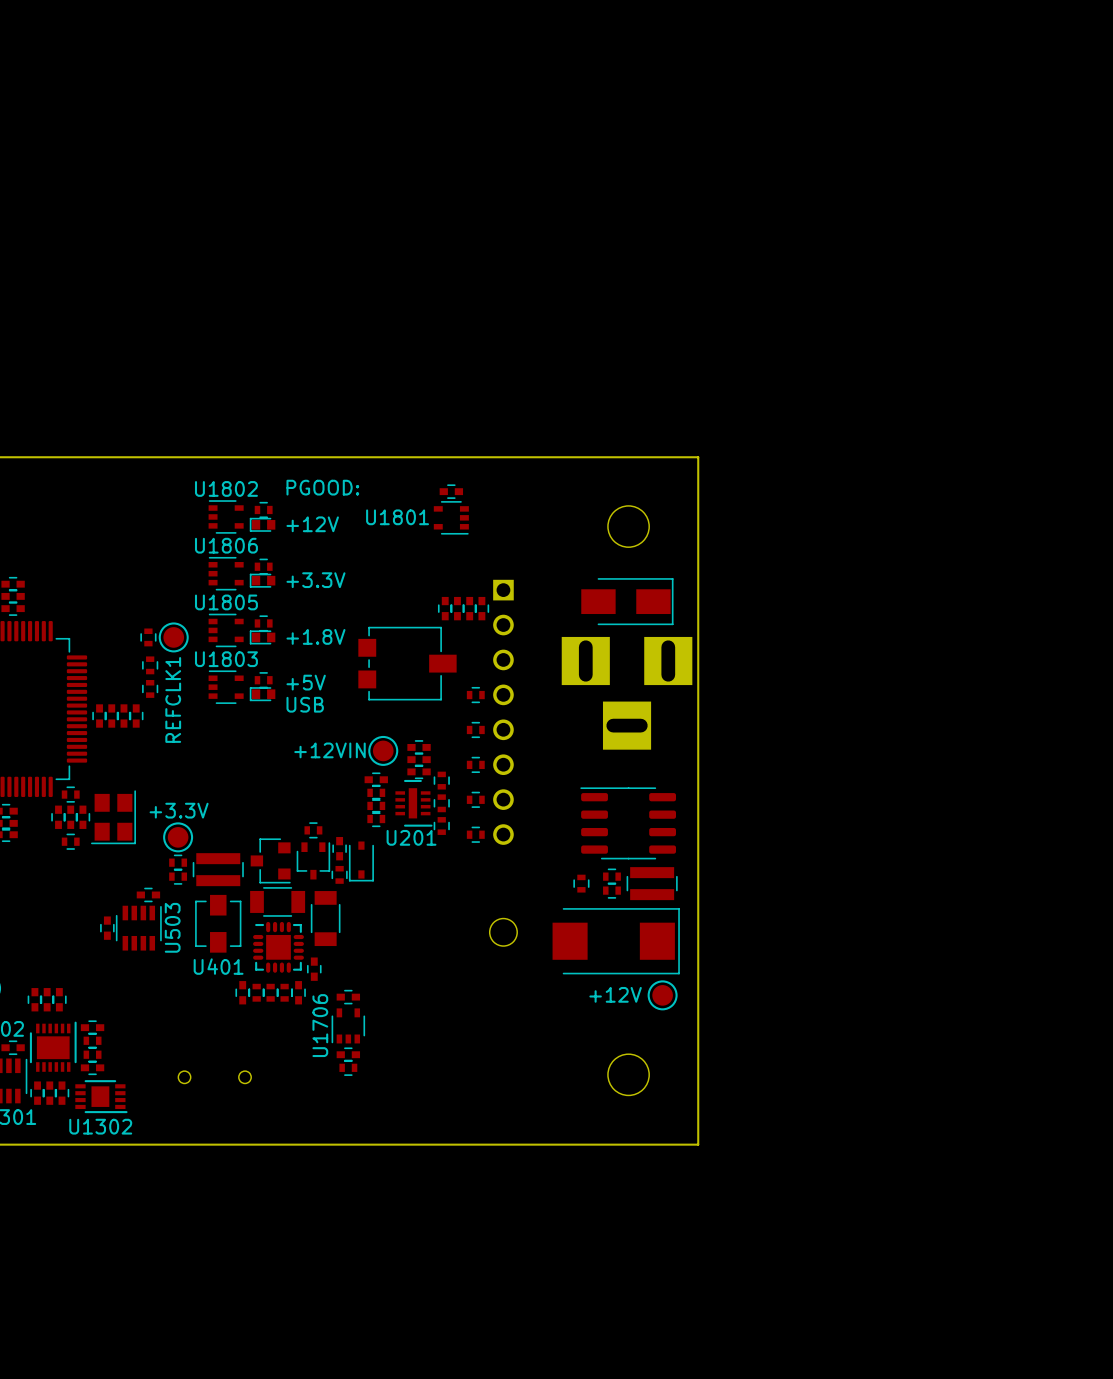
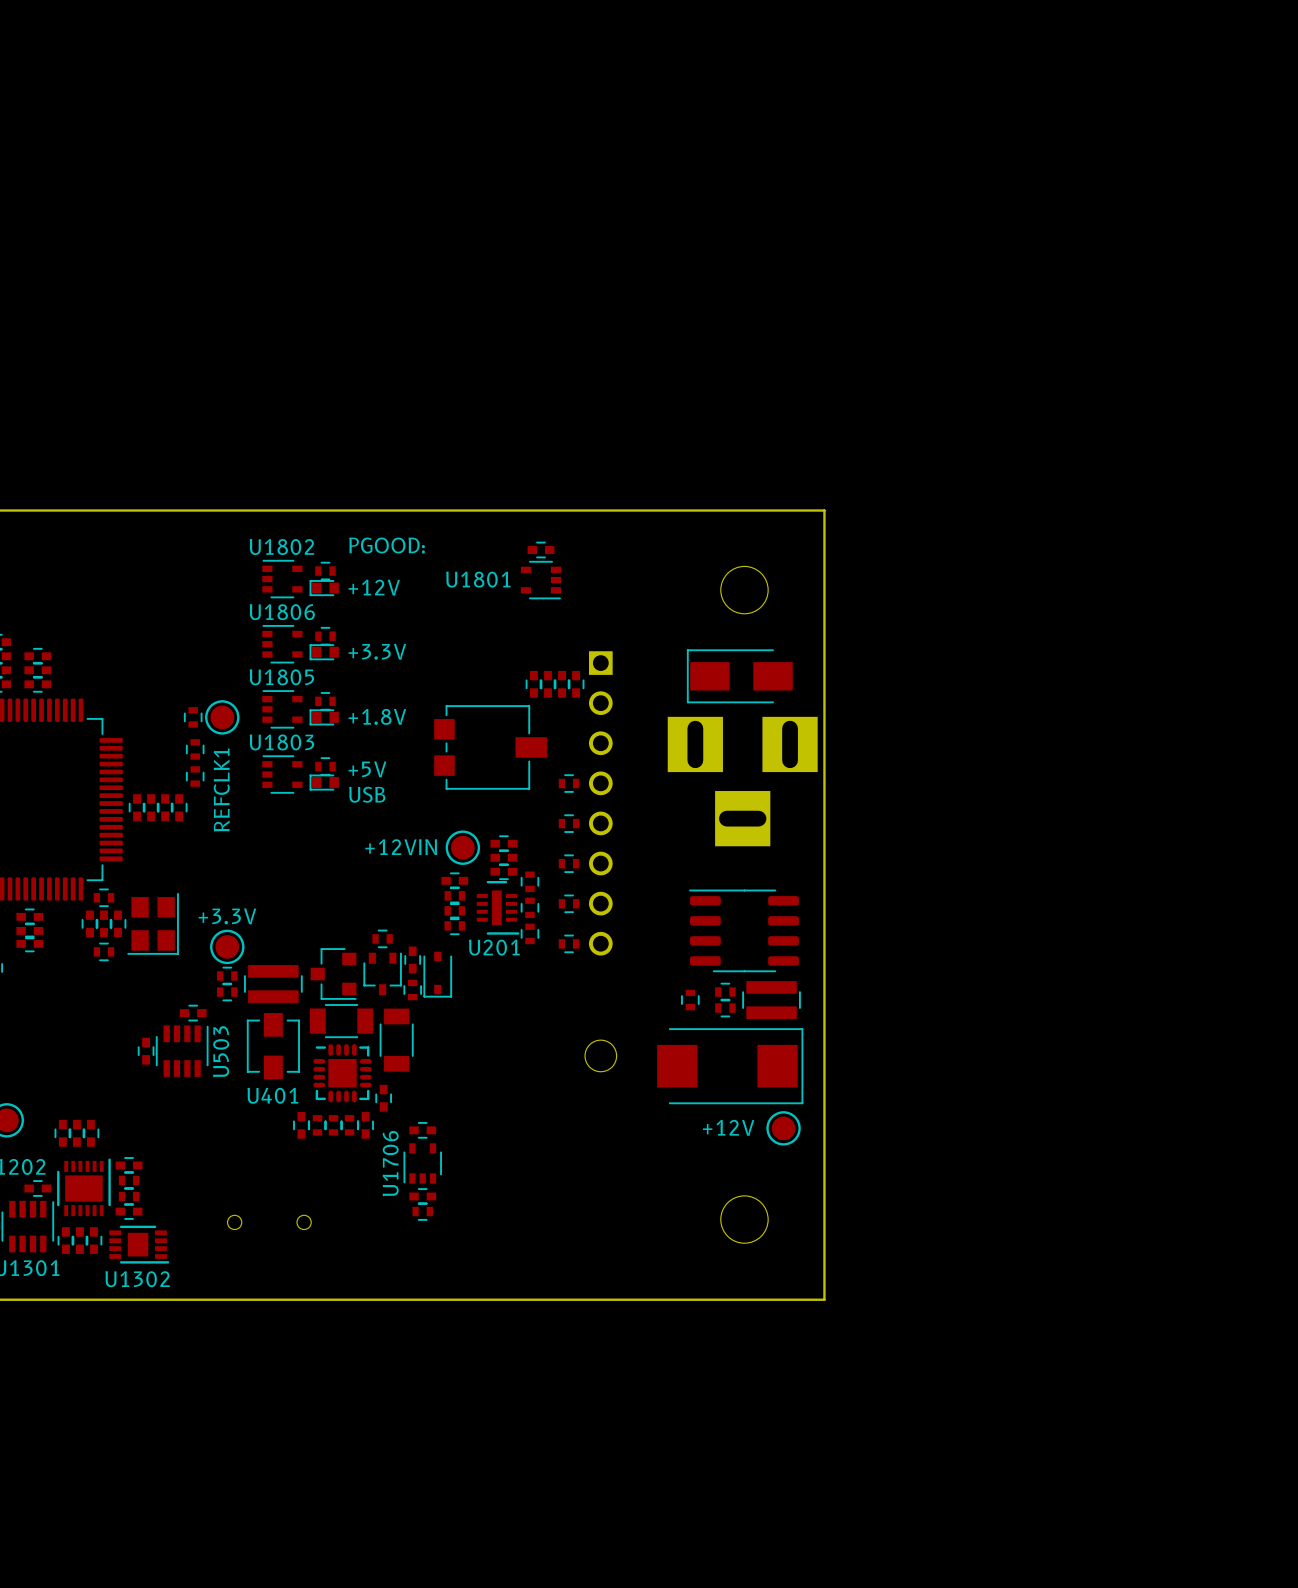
part rotation: 0° (627, 601) -> 180° (739, 676)

